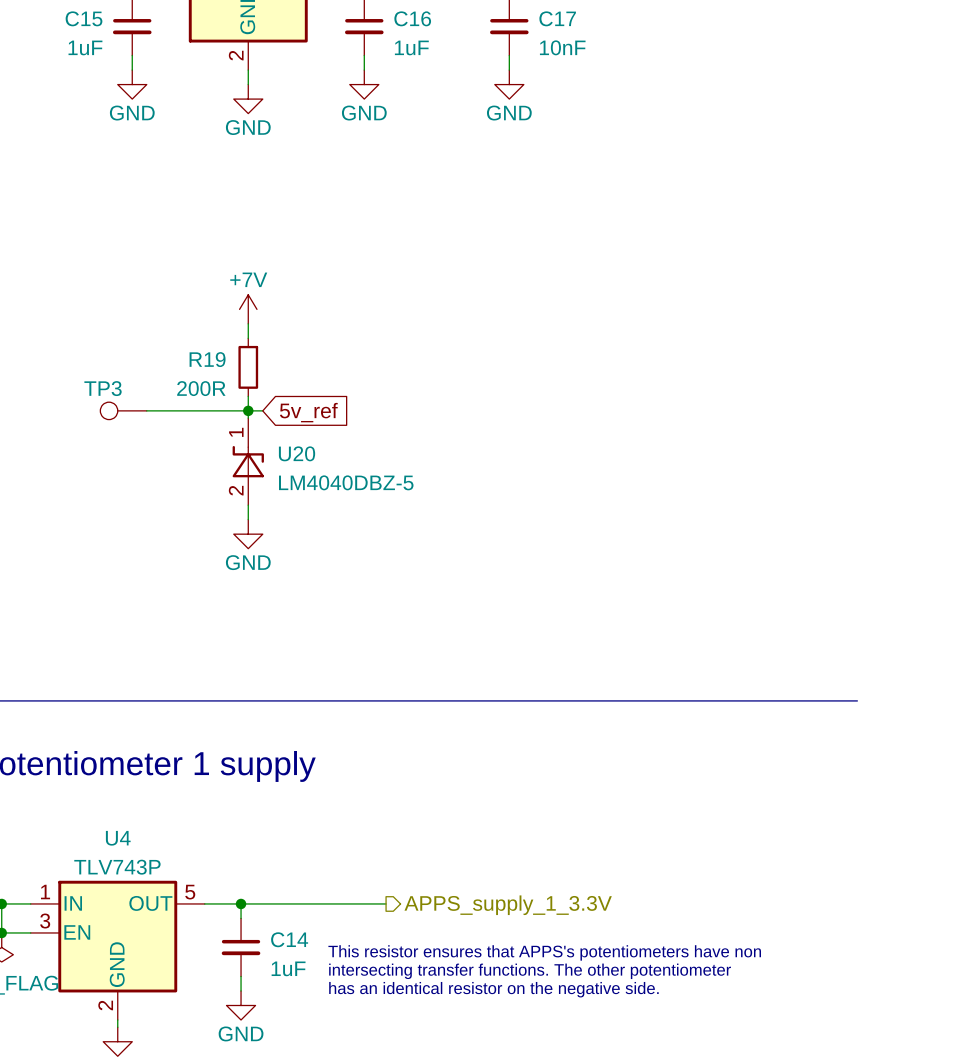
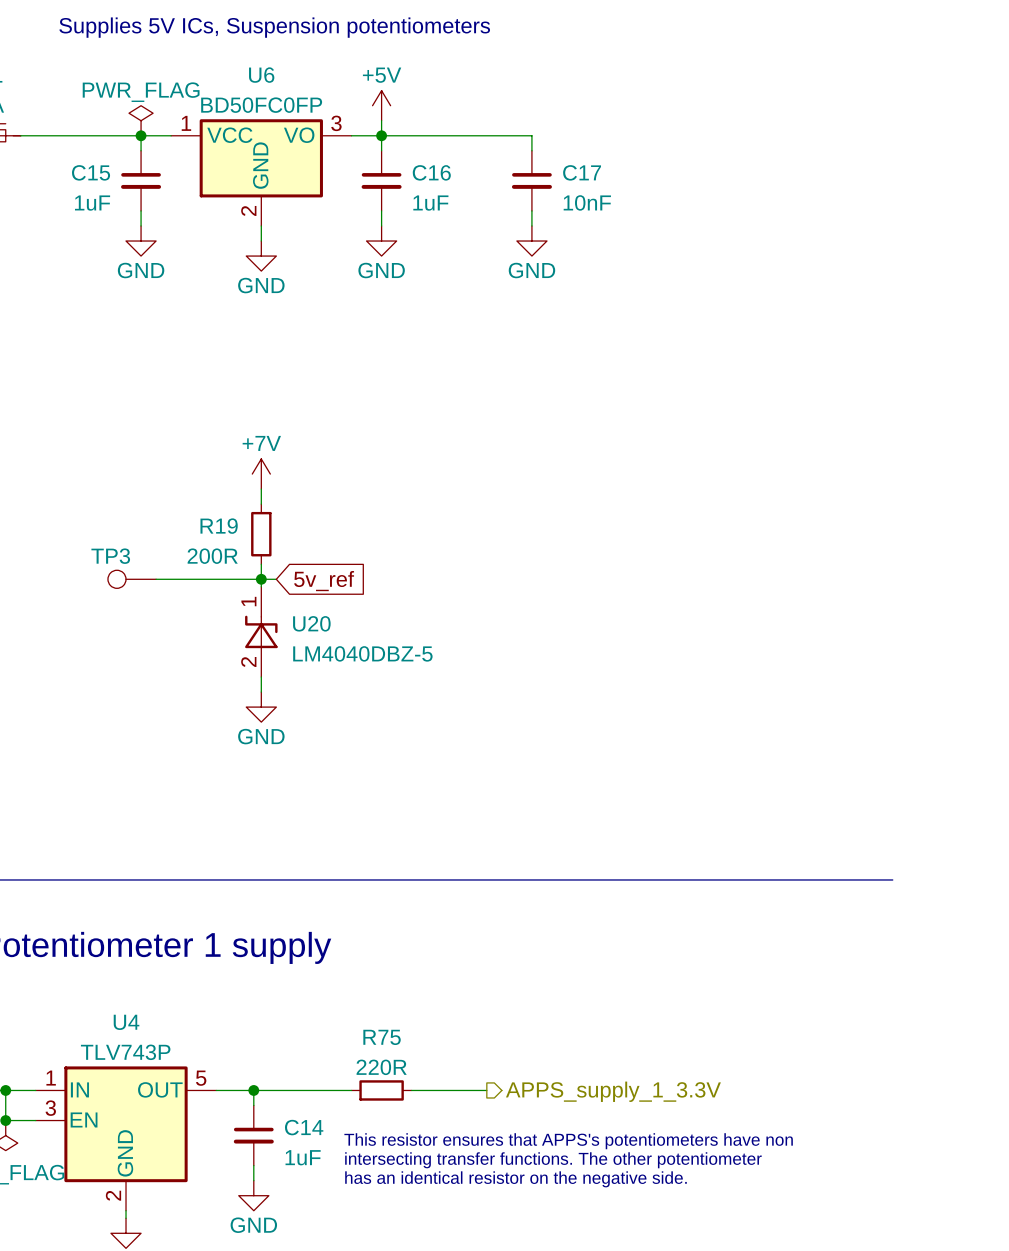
wire: (335, 903) (386, 903) -> none
R75: none -> 220R (381, 1090)
wire: none -> (411, 1090) (486, 1090)
hierarchical label position: APPS_supply_1_3.3V (508, 905) -> APPS_supply_1_3.3V (613, 1091)

